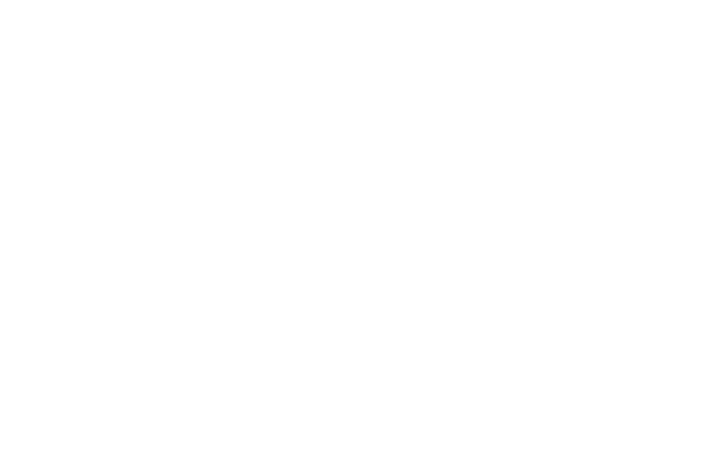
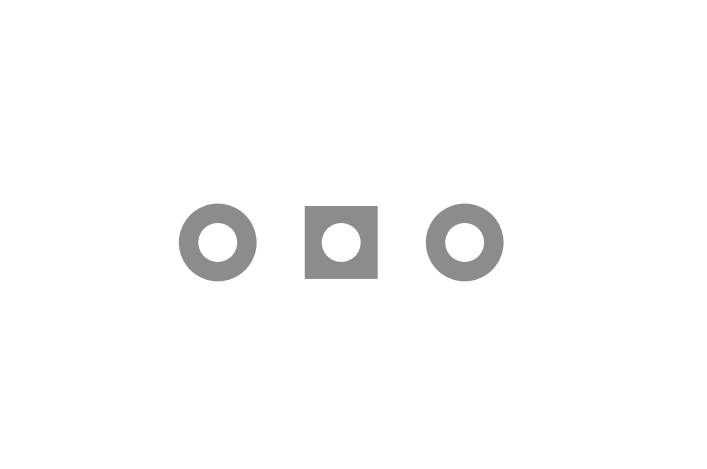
part: none -> (341, 242)

